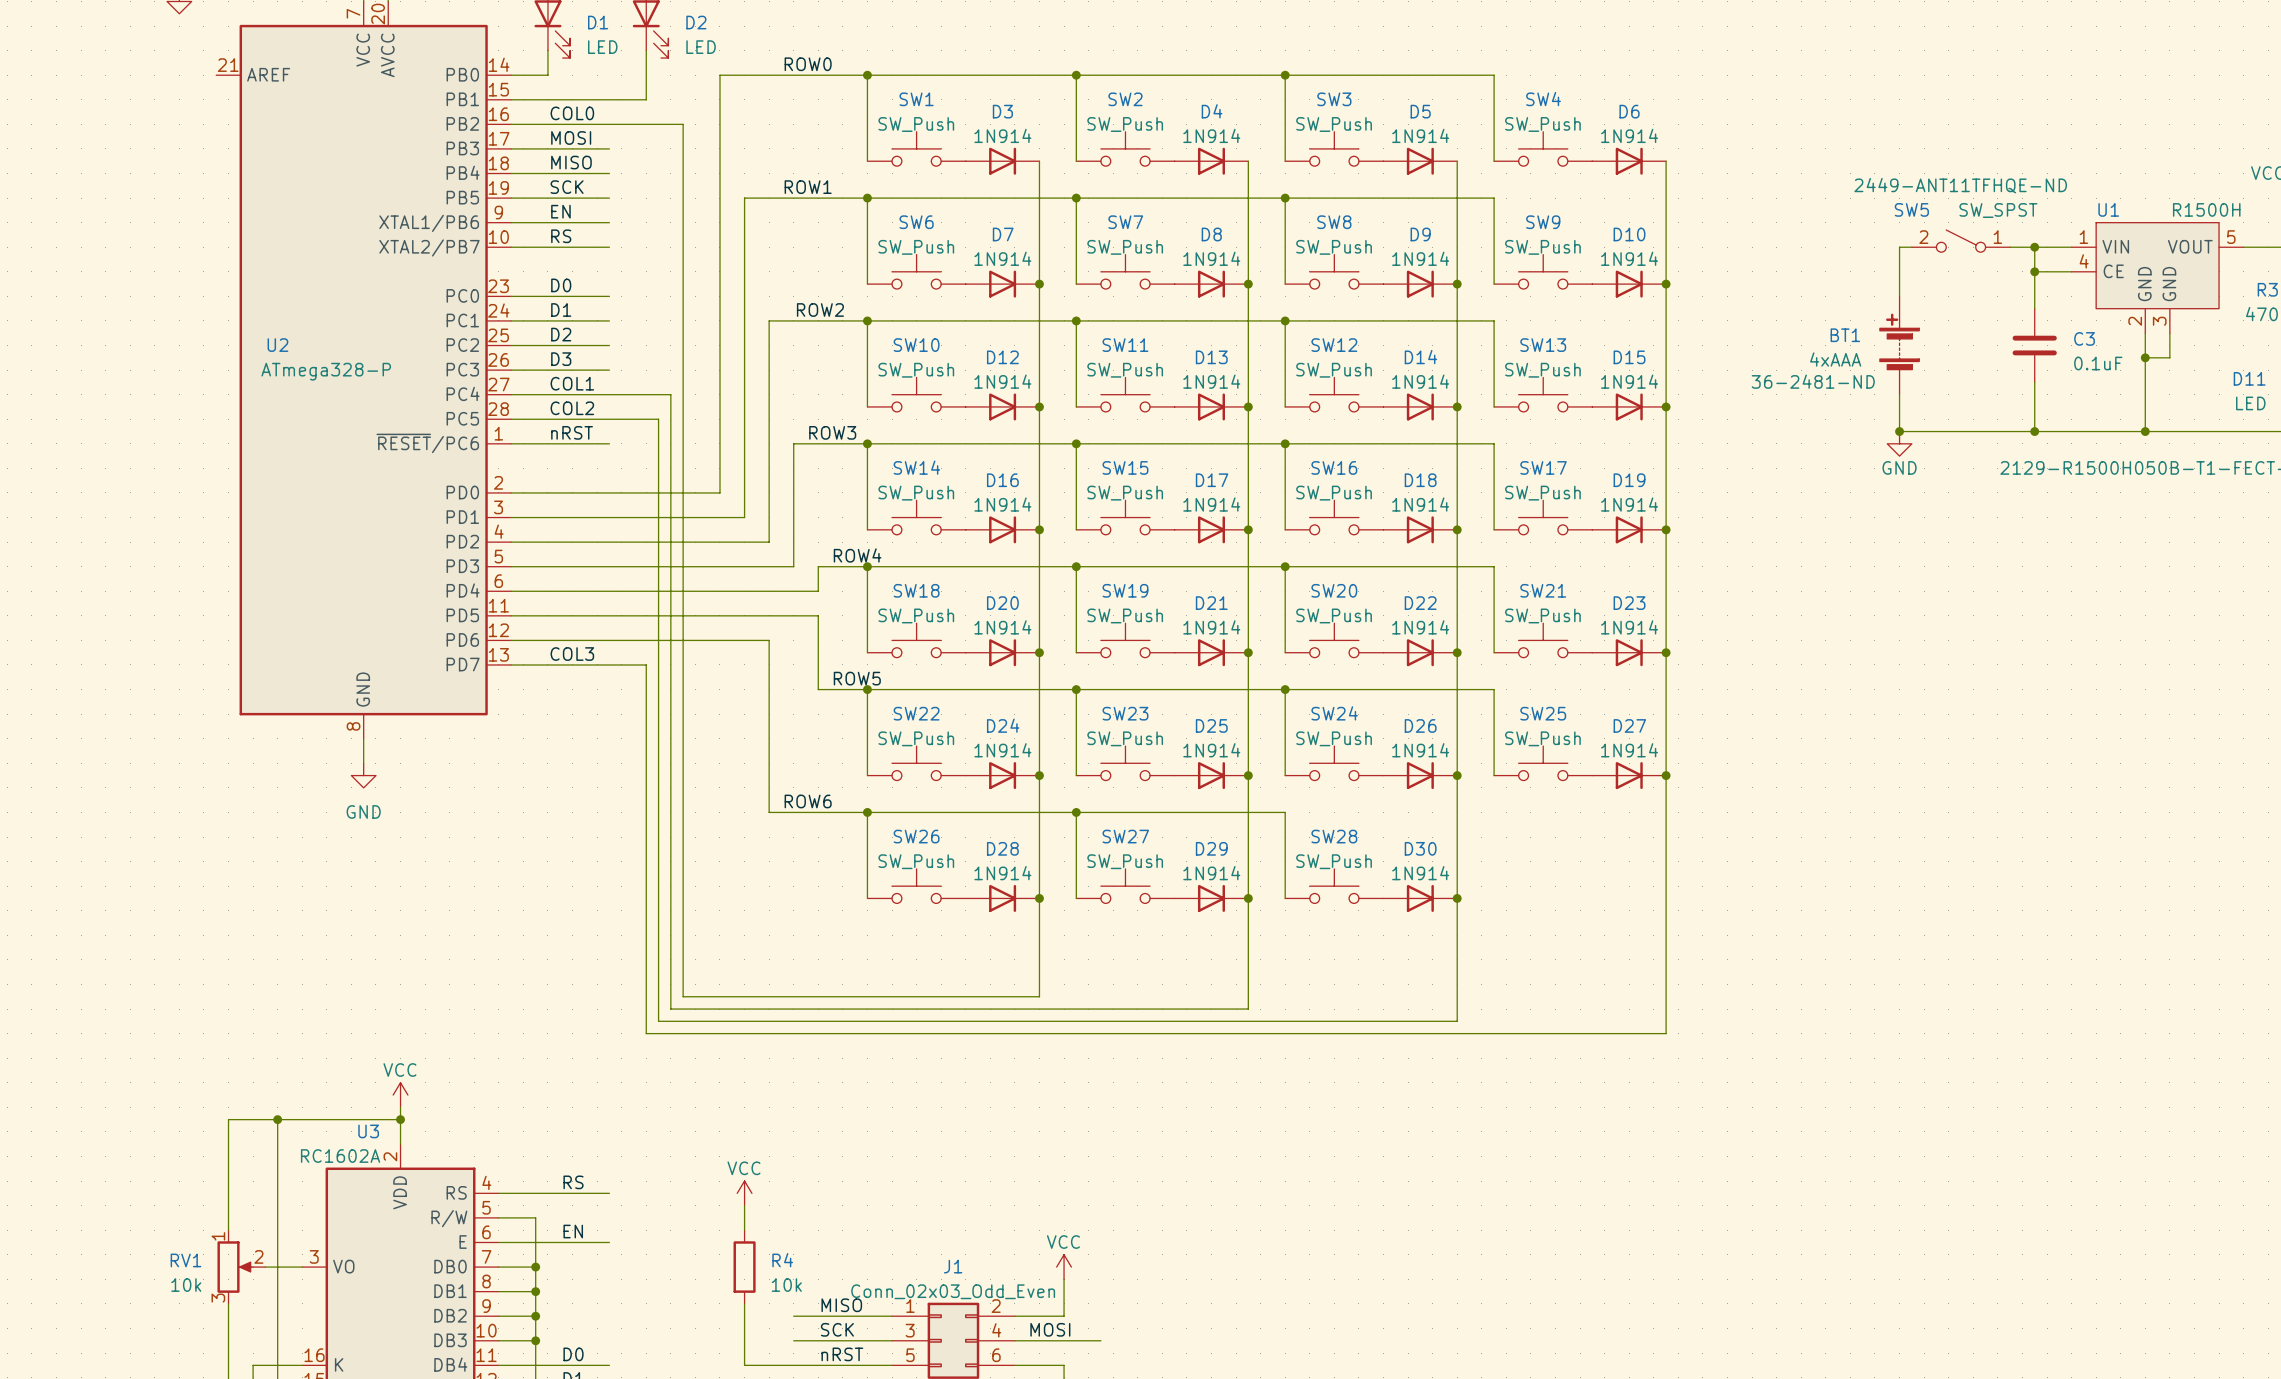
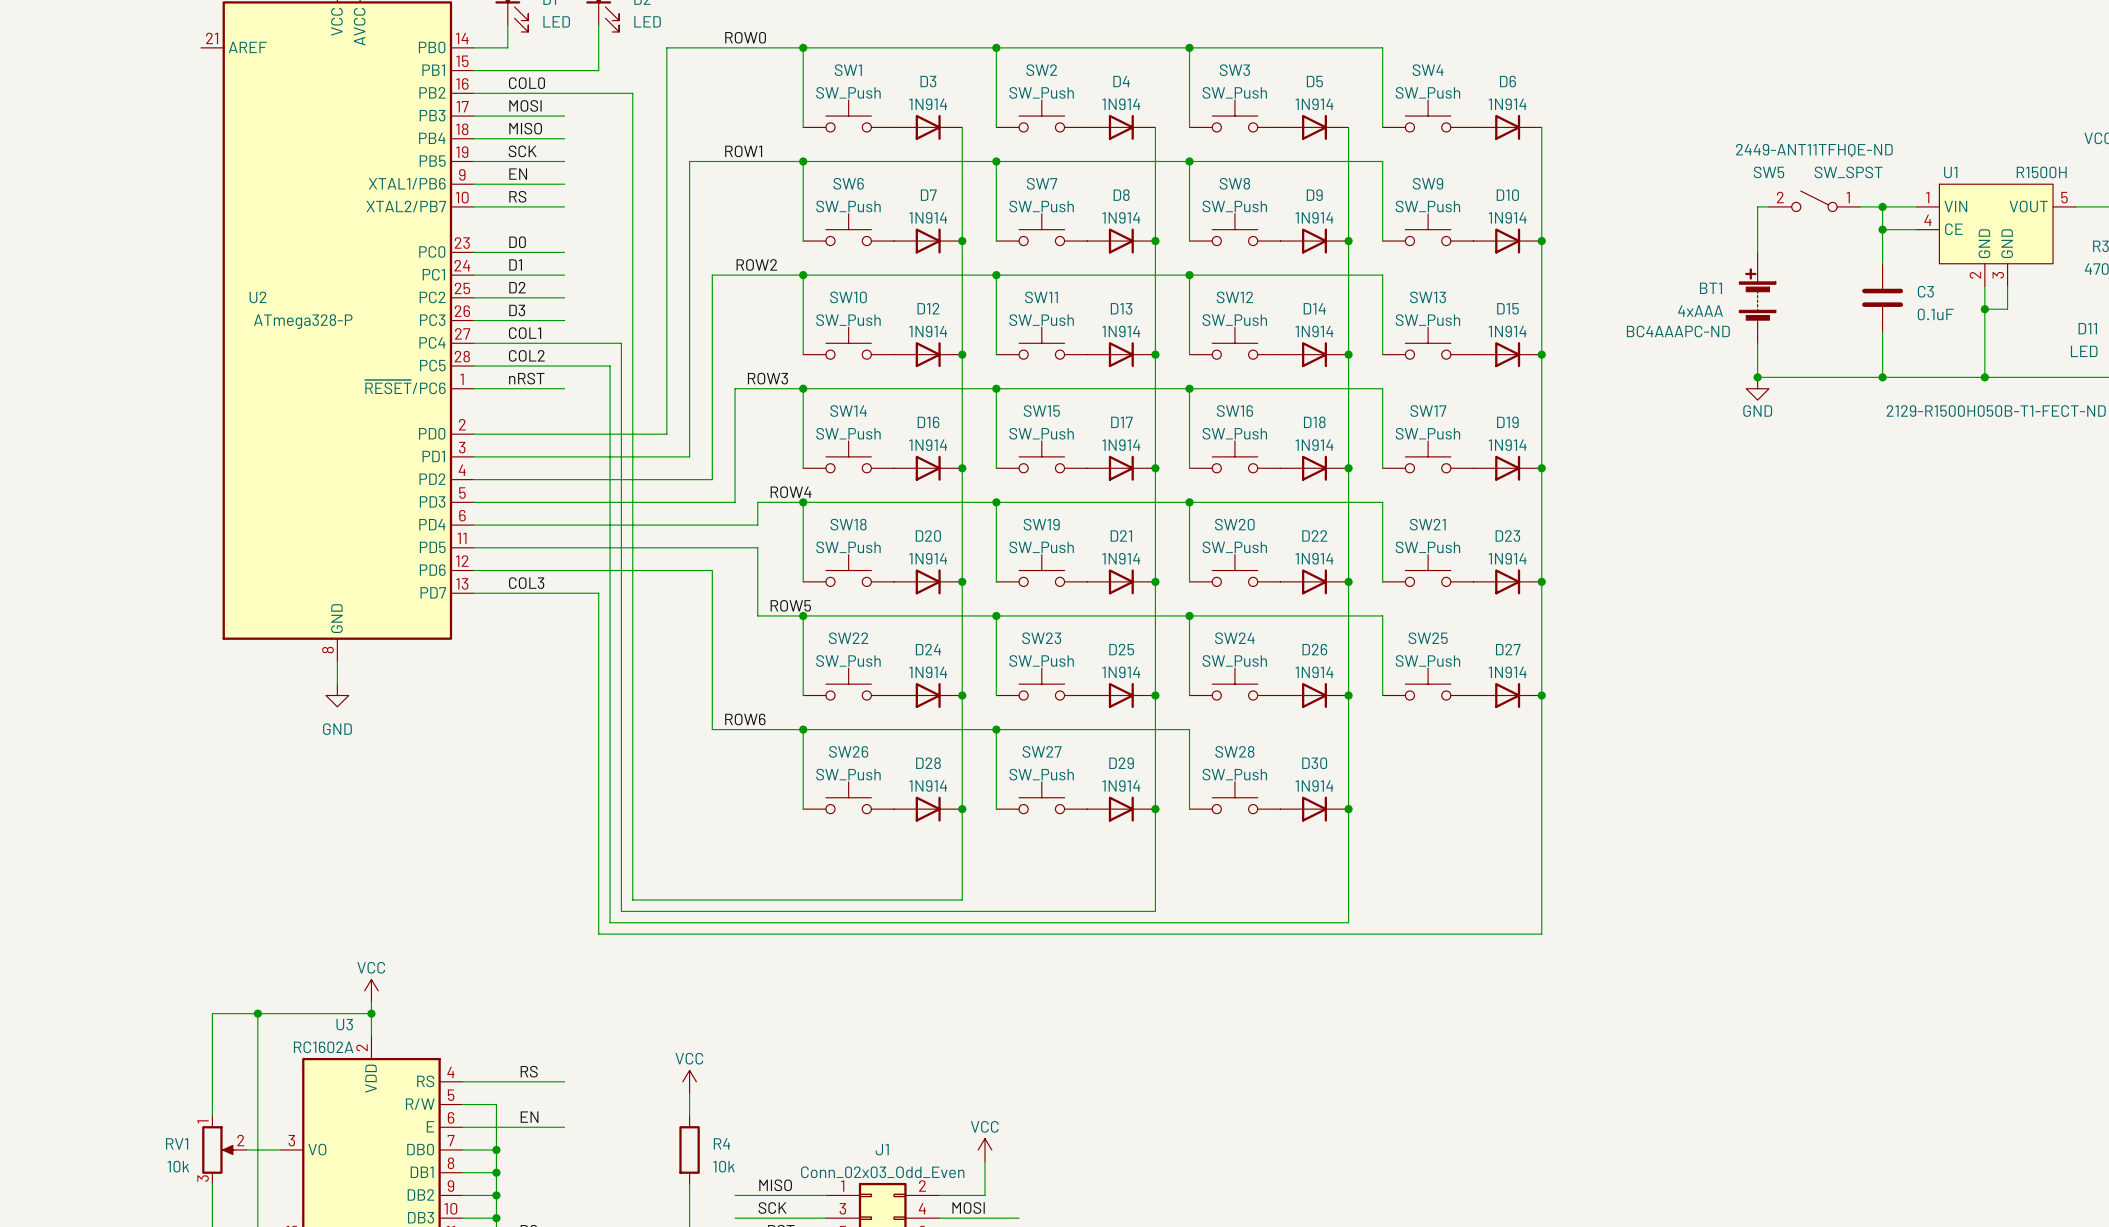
BT1 text: 36-2481-ND (1813, 381) -> BC4AAAPC-ND (1678, 331)

